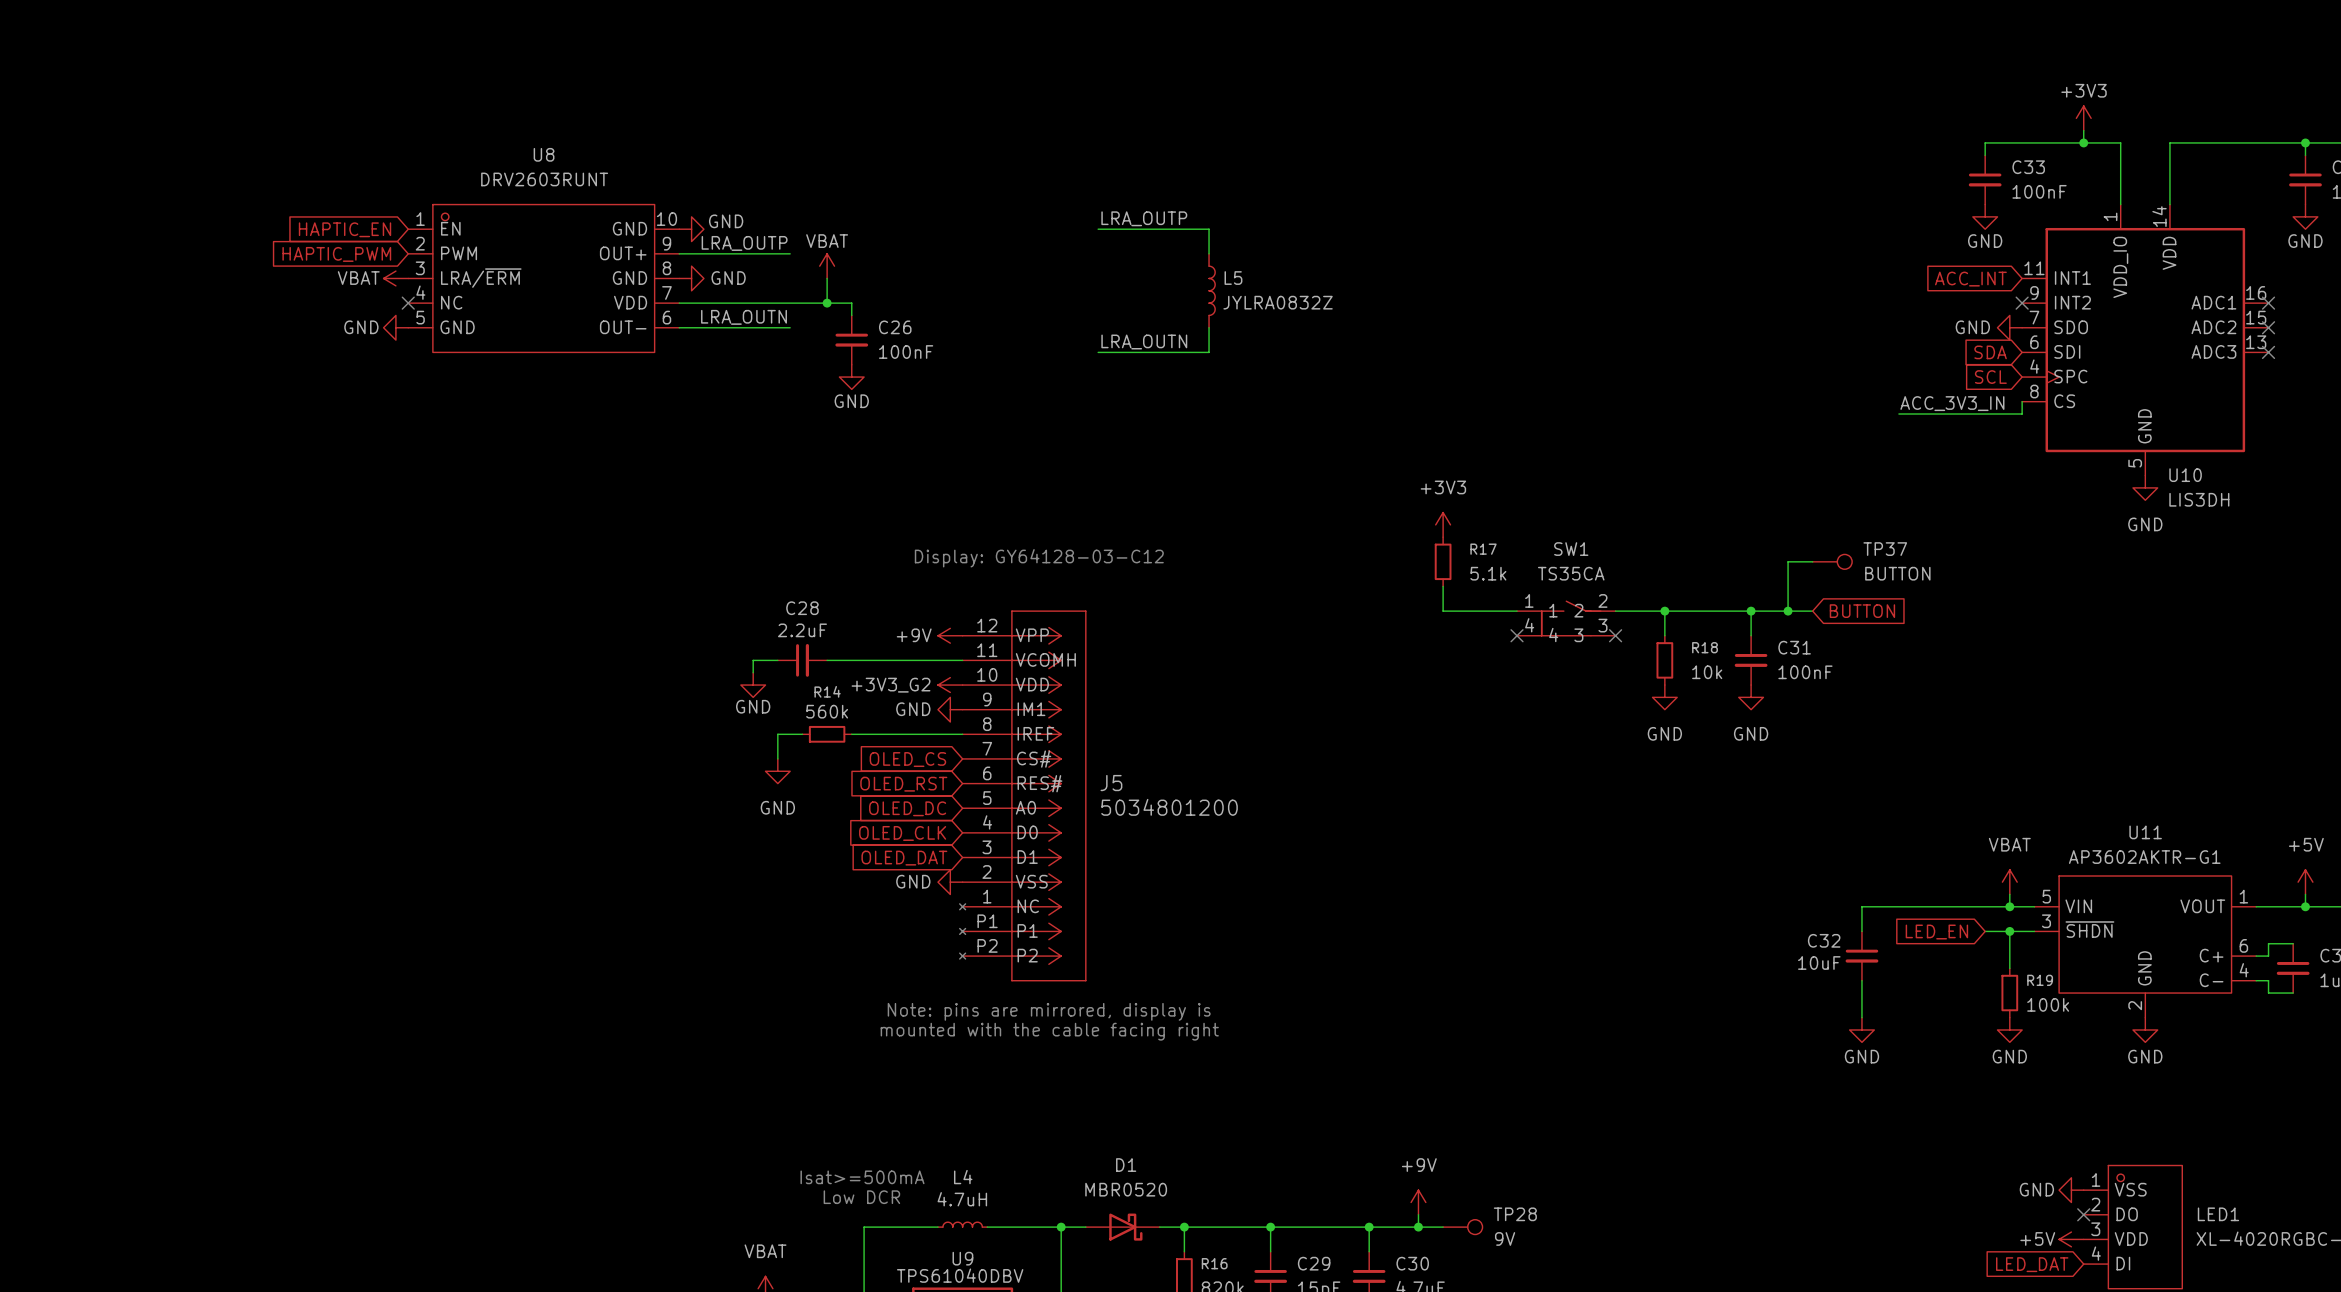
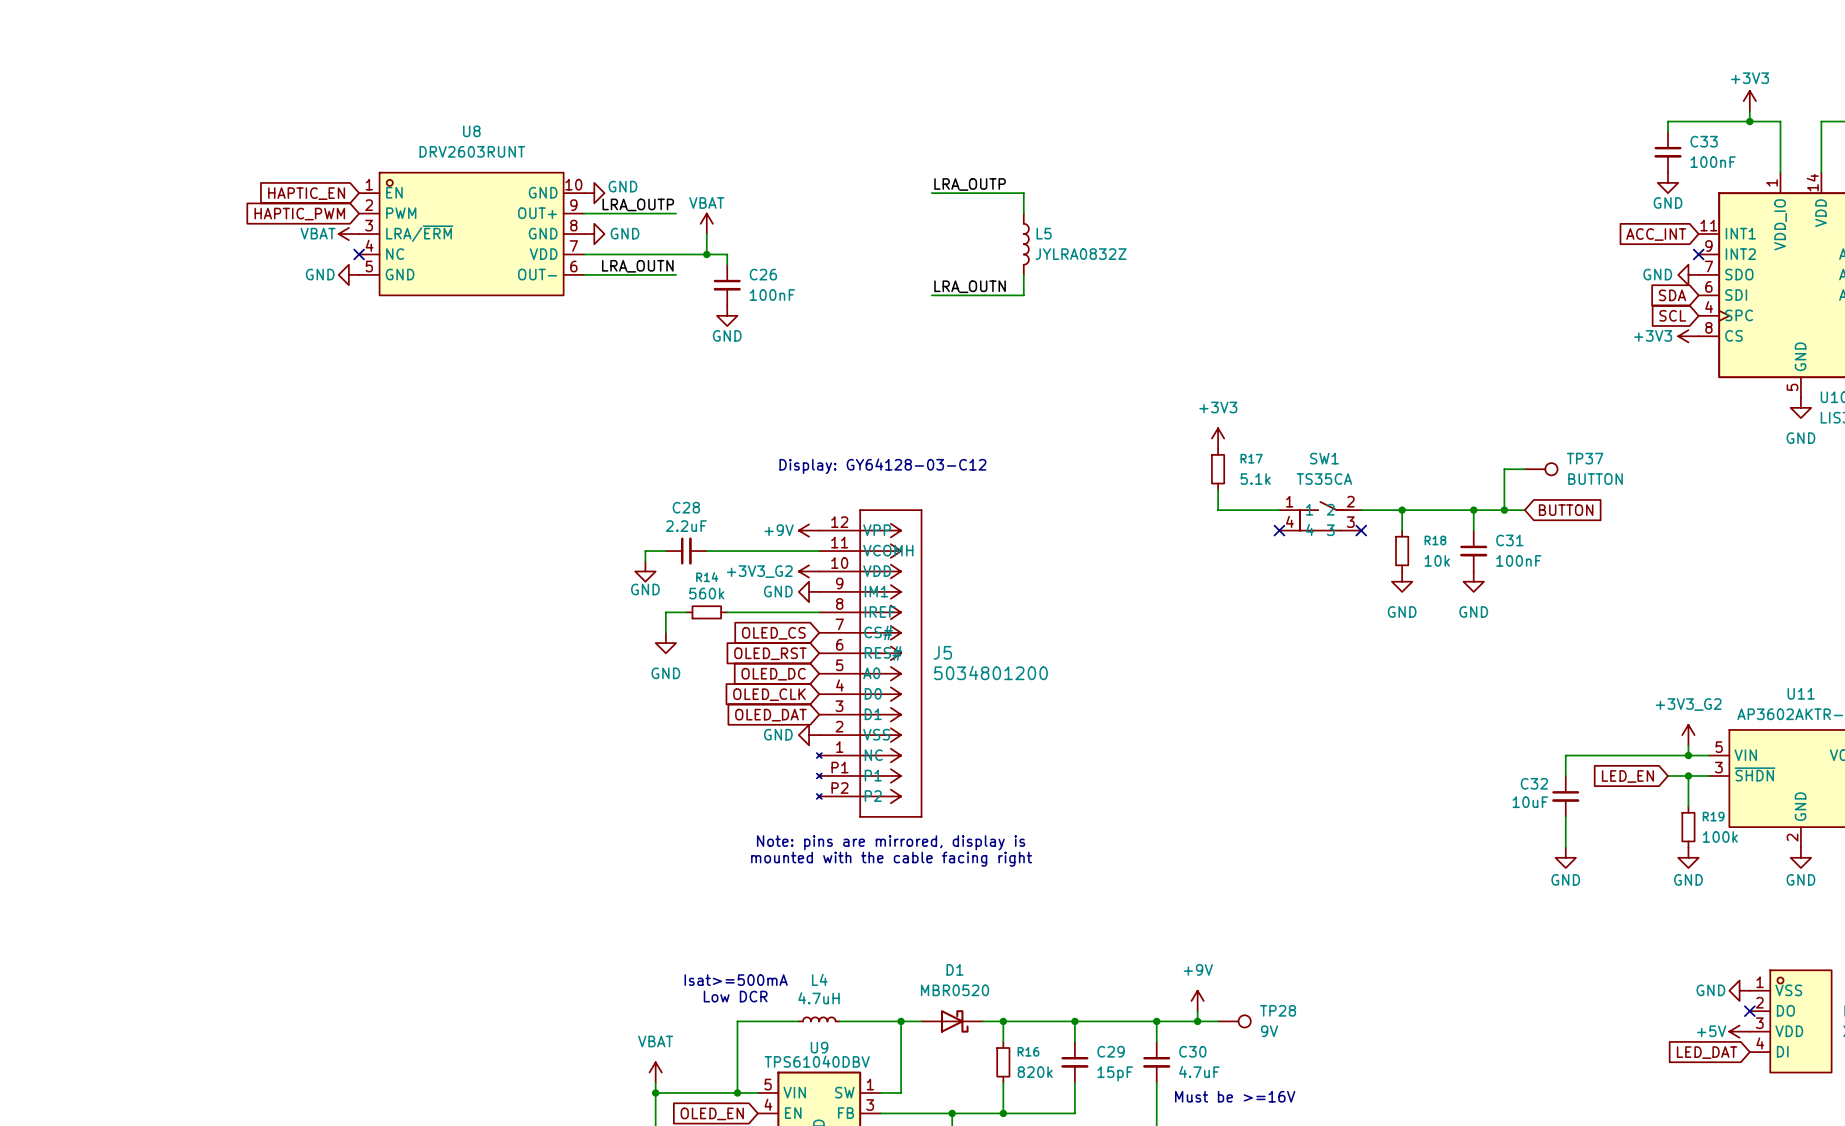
power symbol: none -> +3V3 (1688, 336)
wire: (2022, 401) (2022, 414) (1898, 414) -> none
label: ACC_3V3_IN (1952, 403) -> none
power symbol: VBAT (2009, 882) -> +3V3_G2 (1688, 735)

